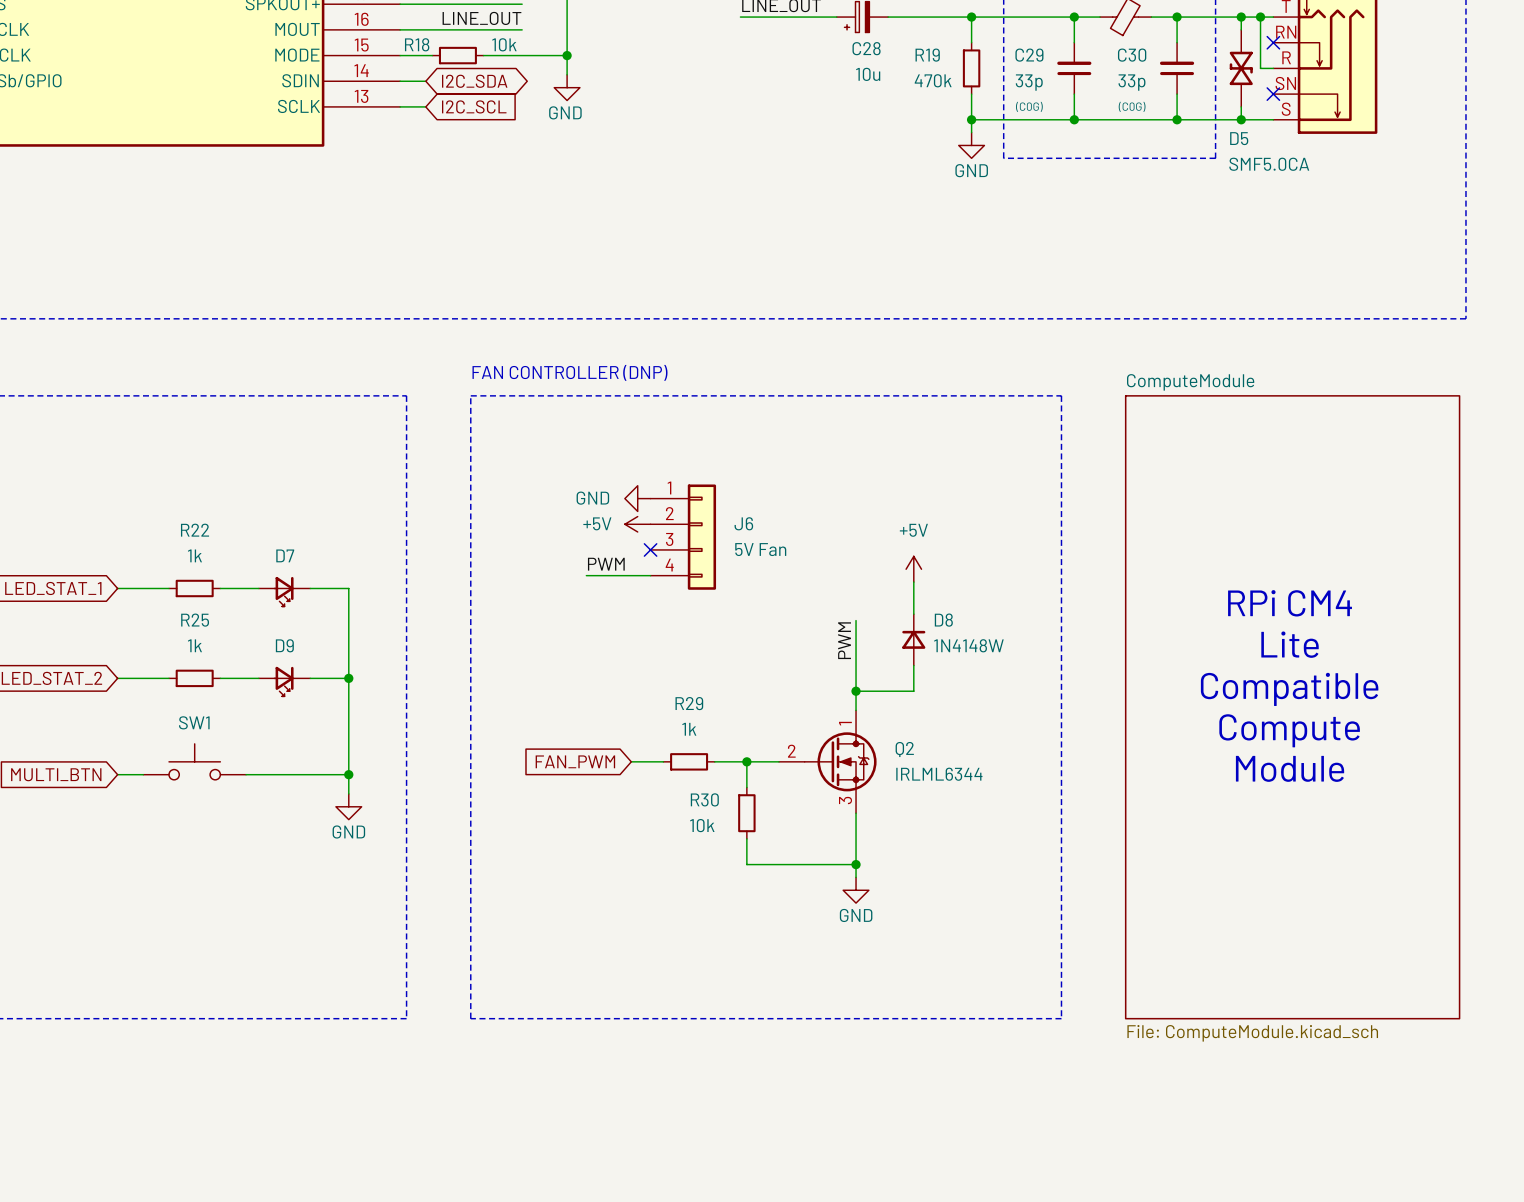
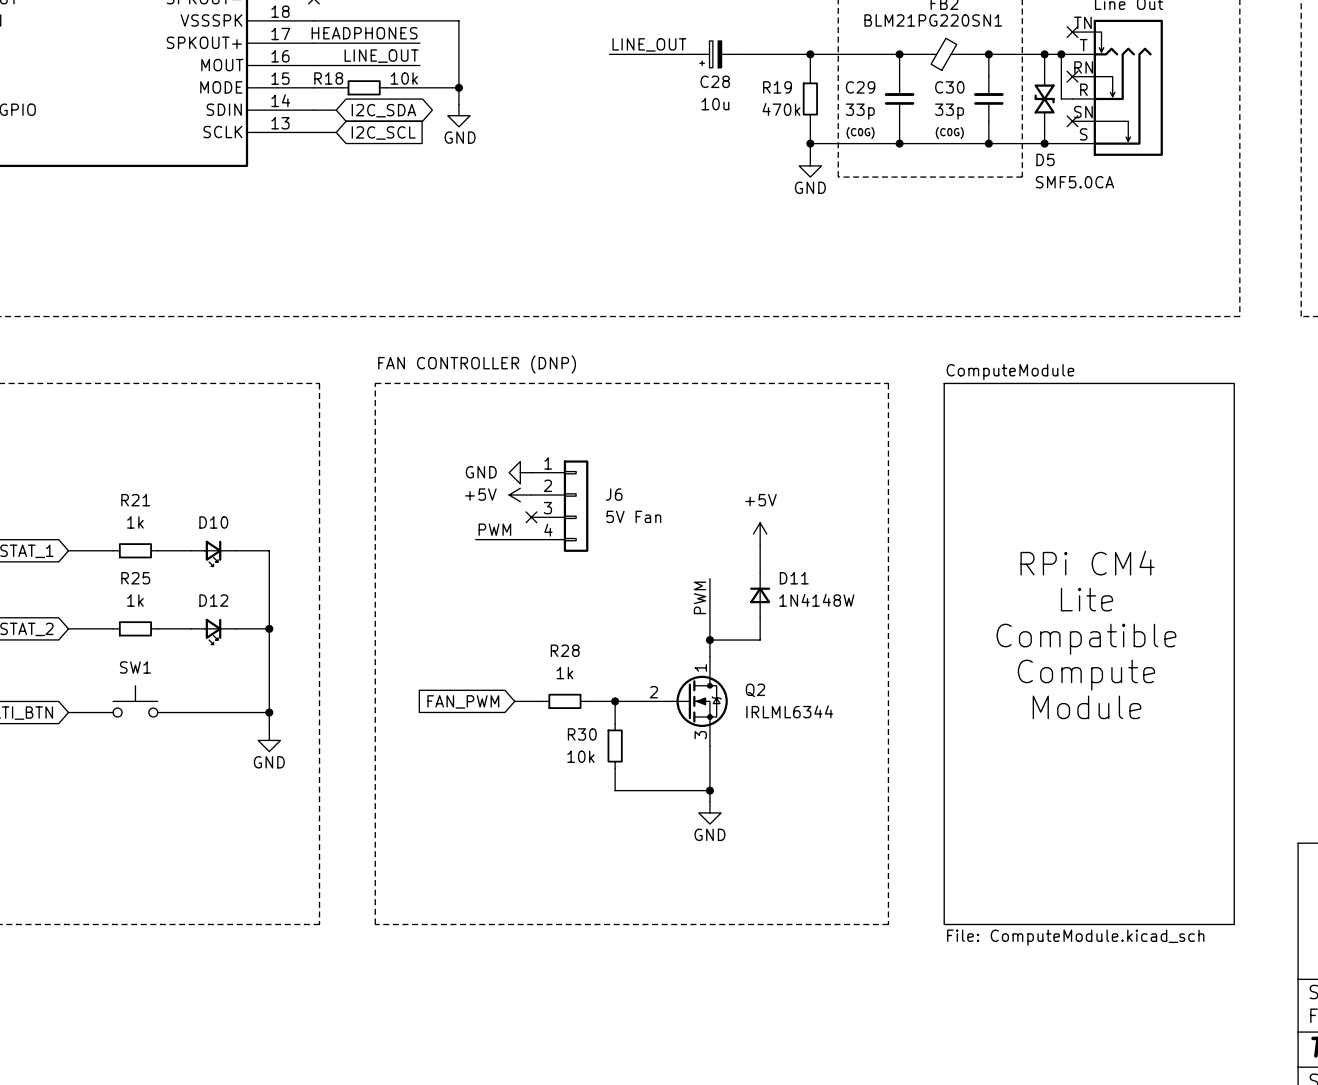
R22 name: R22 (195, 530) -> R21 (135, 500)
D7 name: D7 (285, 555) -> D10 (213, 522)
D8 name: D8 (943, 620) -> D11 (794, 578)
D9 name: D9 (284, 645) -> D12 (213, 600)
R29 name: R29 (689, 703) -> R28 (565, 650)

